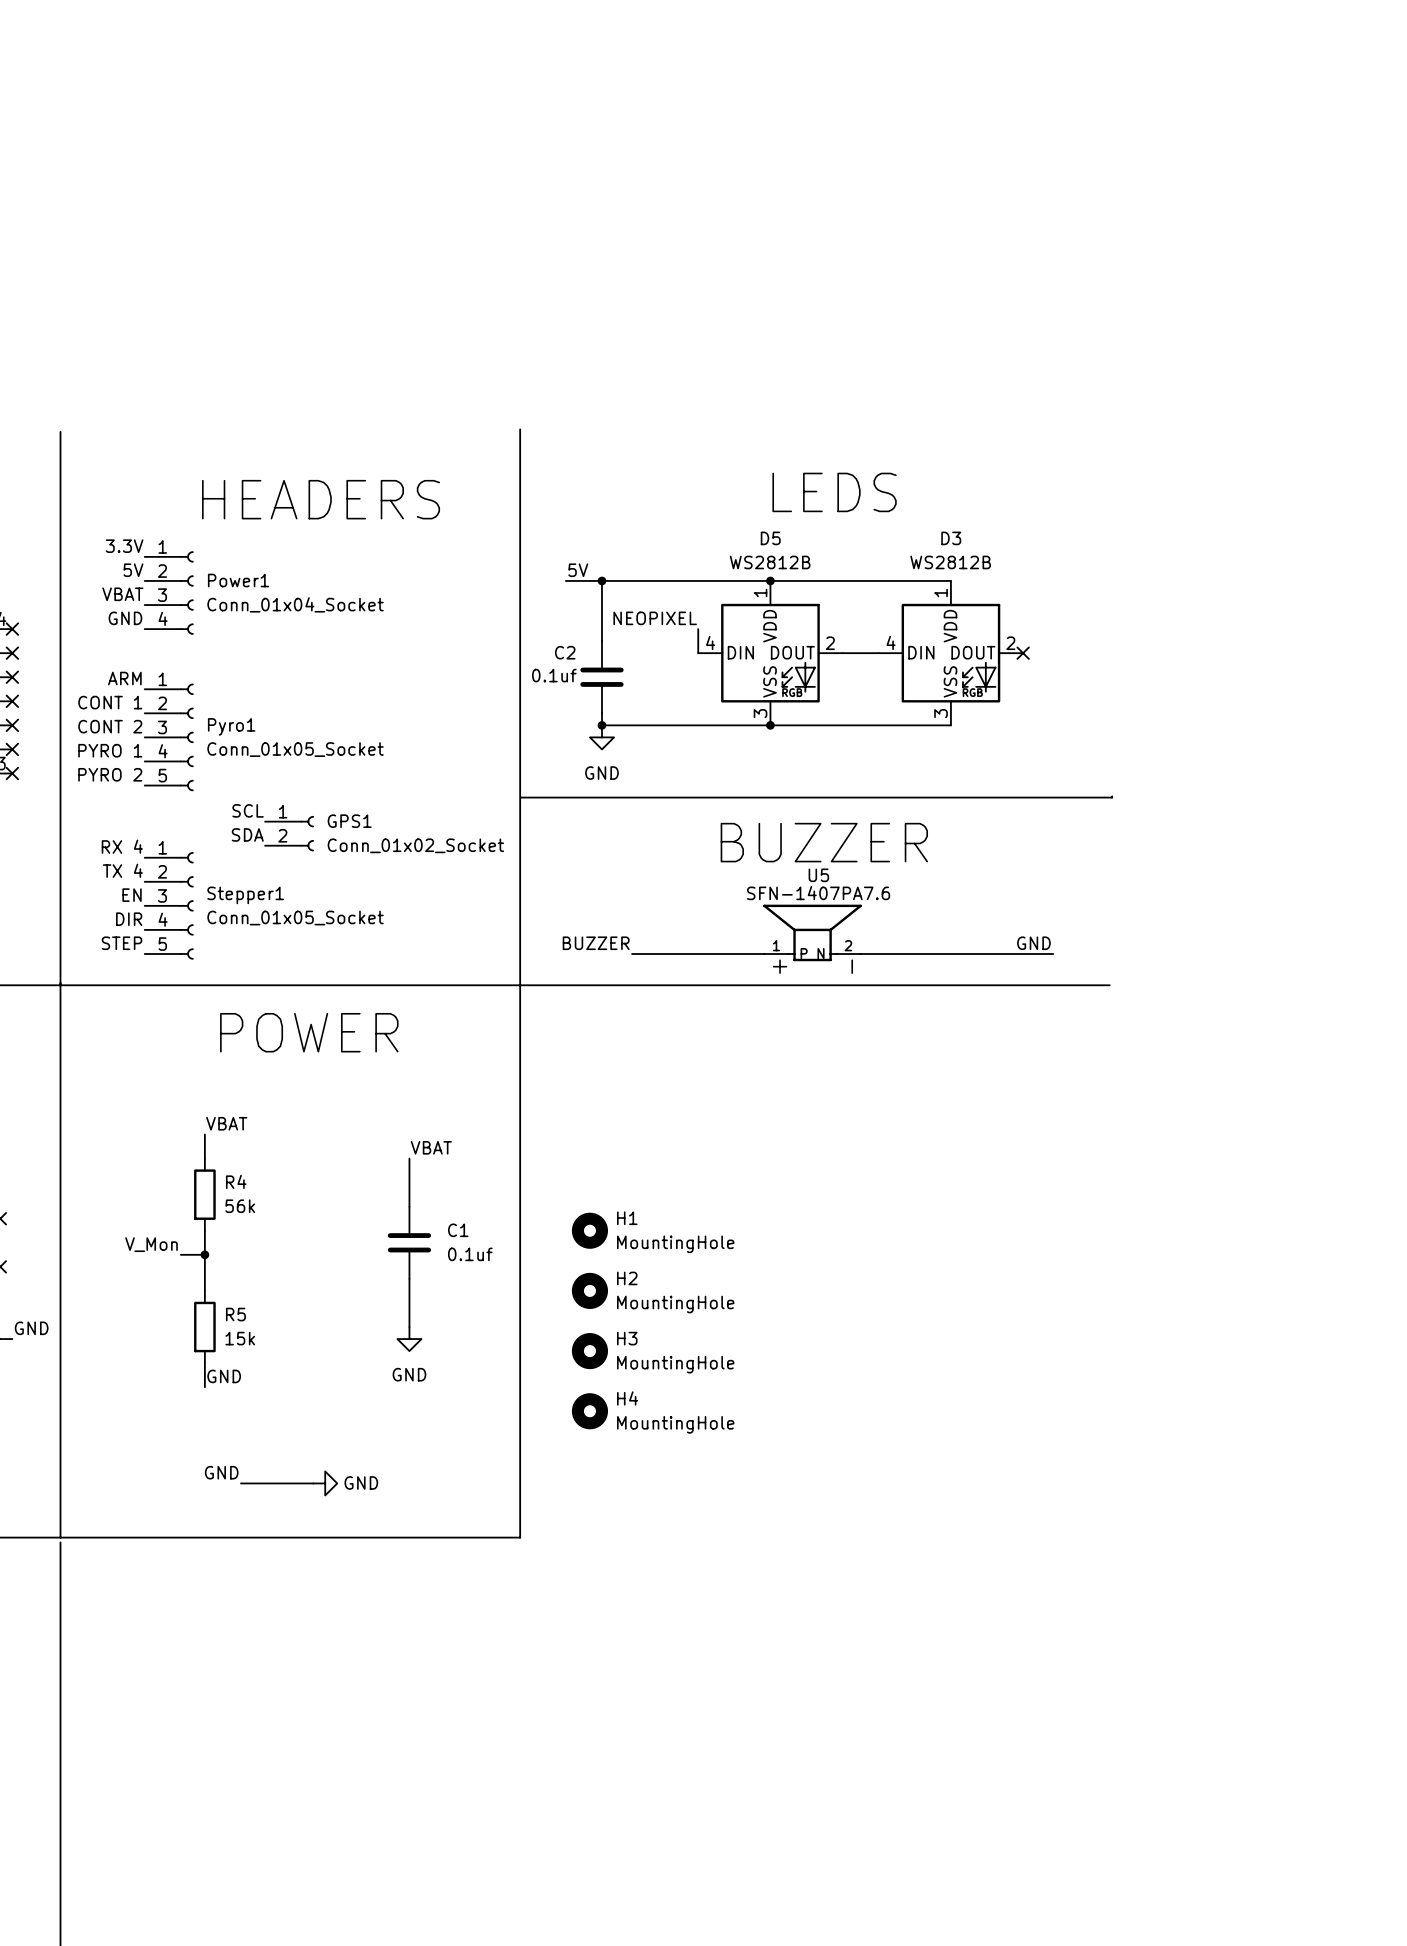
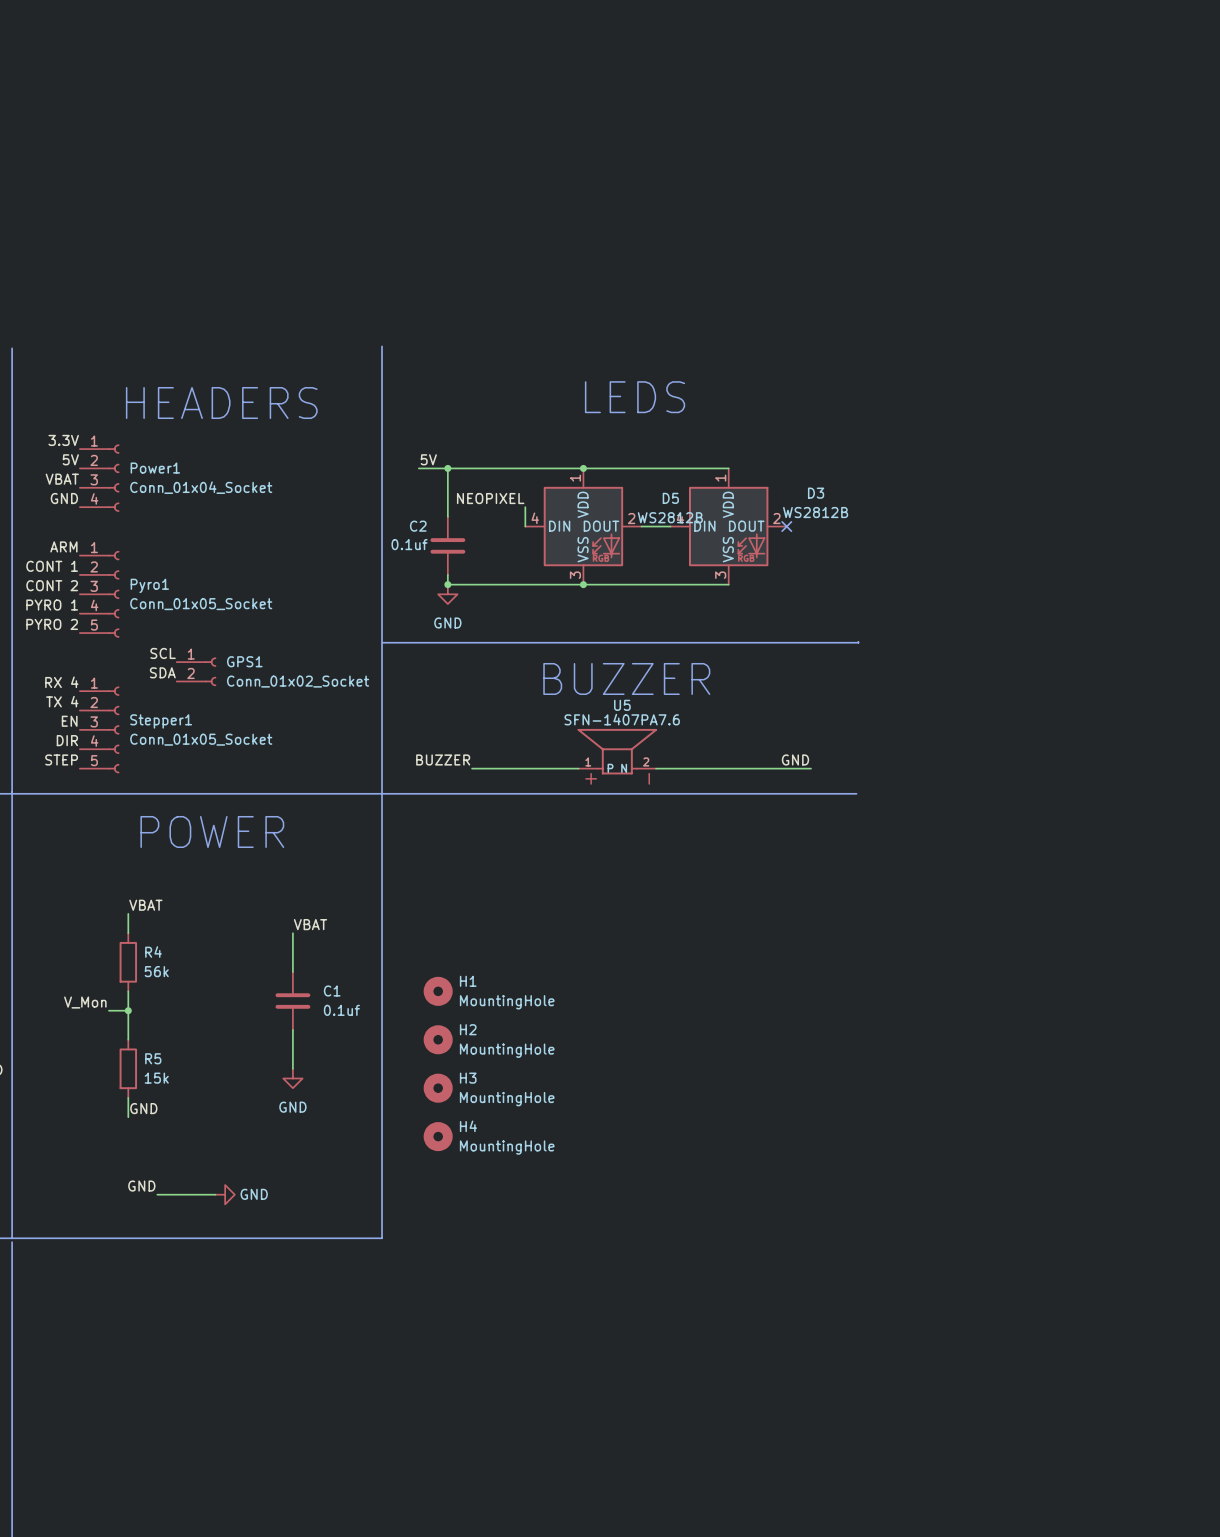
D5 name position: D5 (770, 538) -> D5 (670, 498)
D3 name position: D3 (951, 538) -> D3 (816, 493)
D5 value position: WS2812B (770, 562) -> WS2812B (670, 517)
D3 value position: WS2812B (950, 562) -> WS2812B (815, 512)

